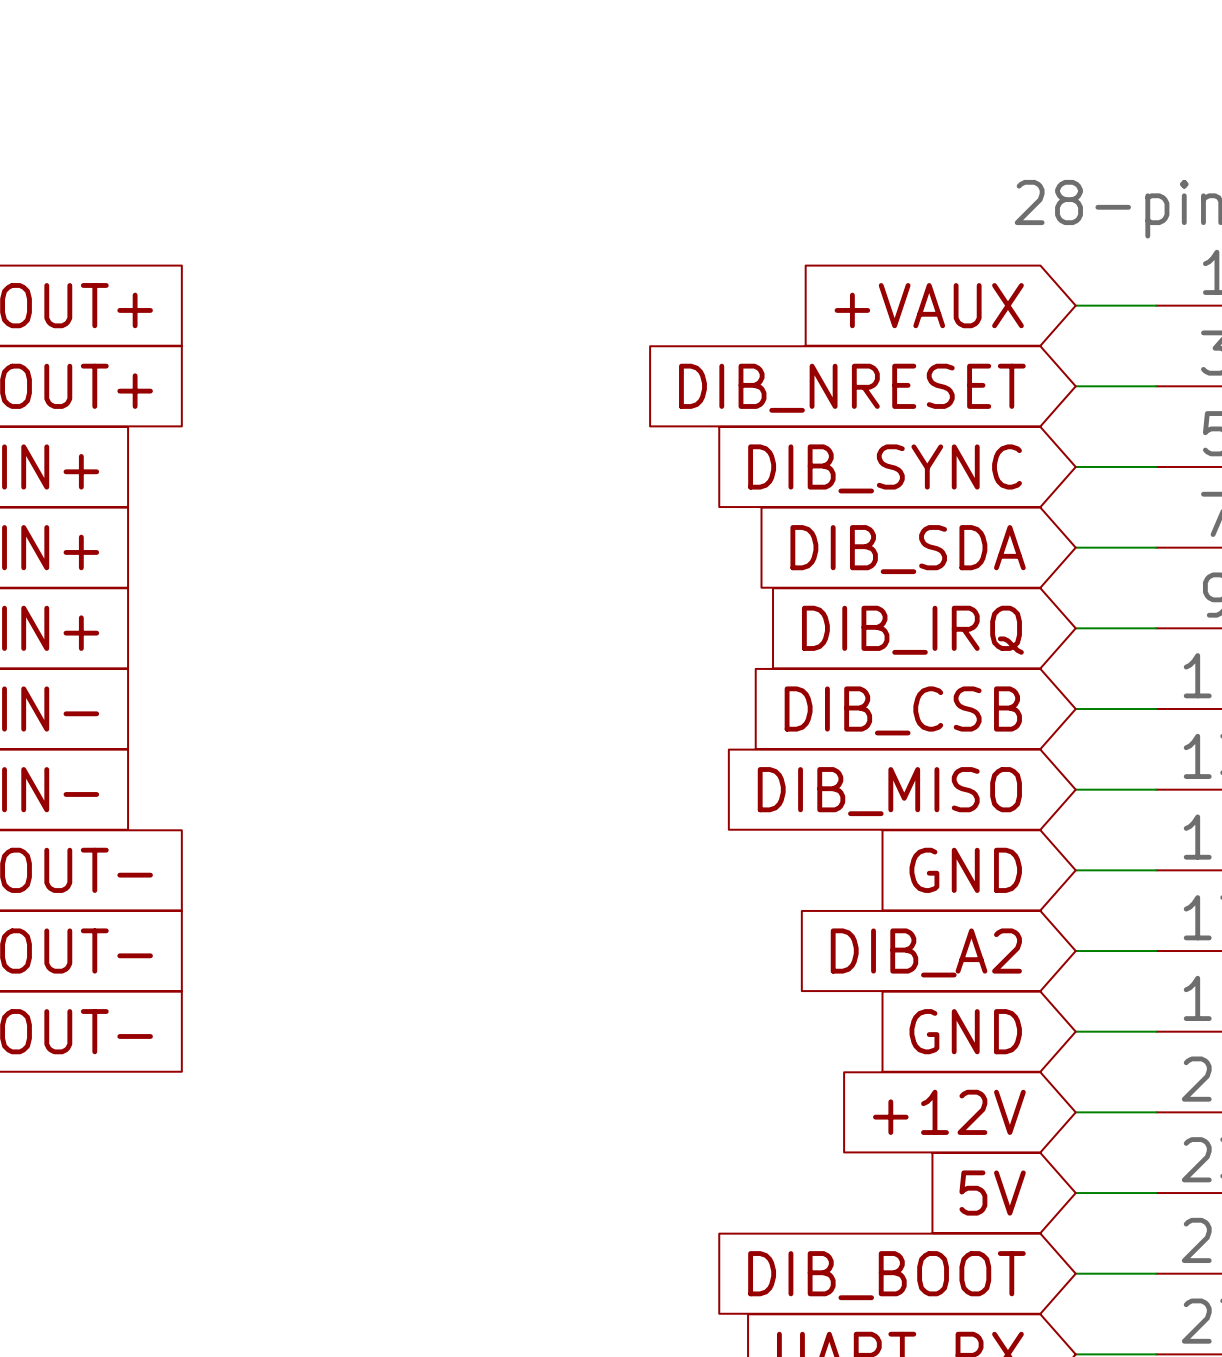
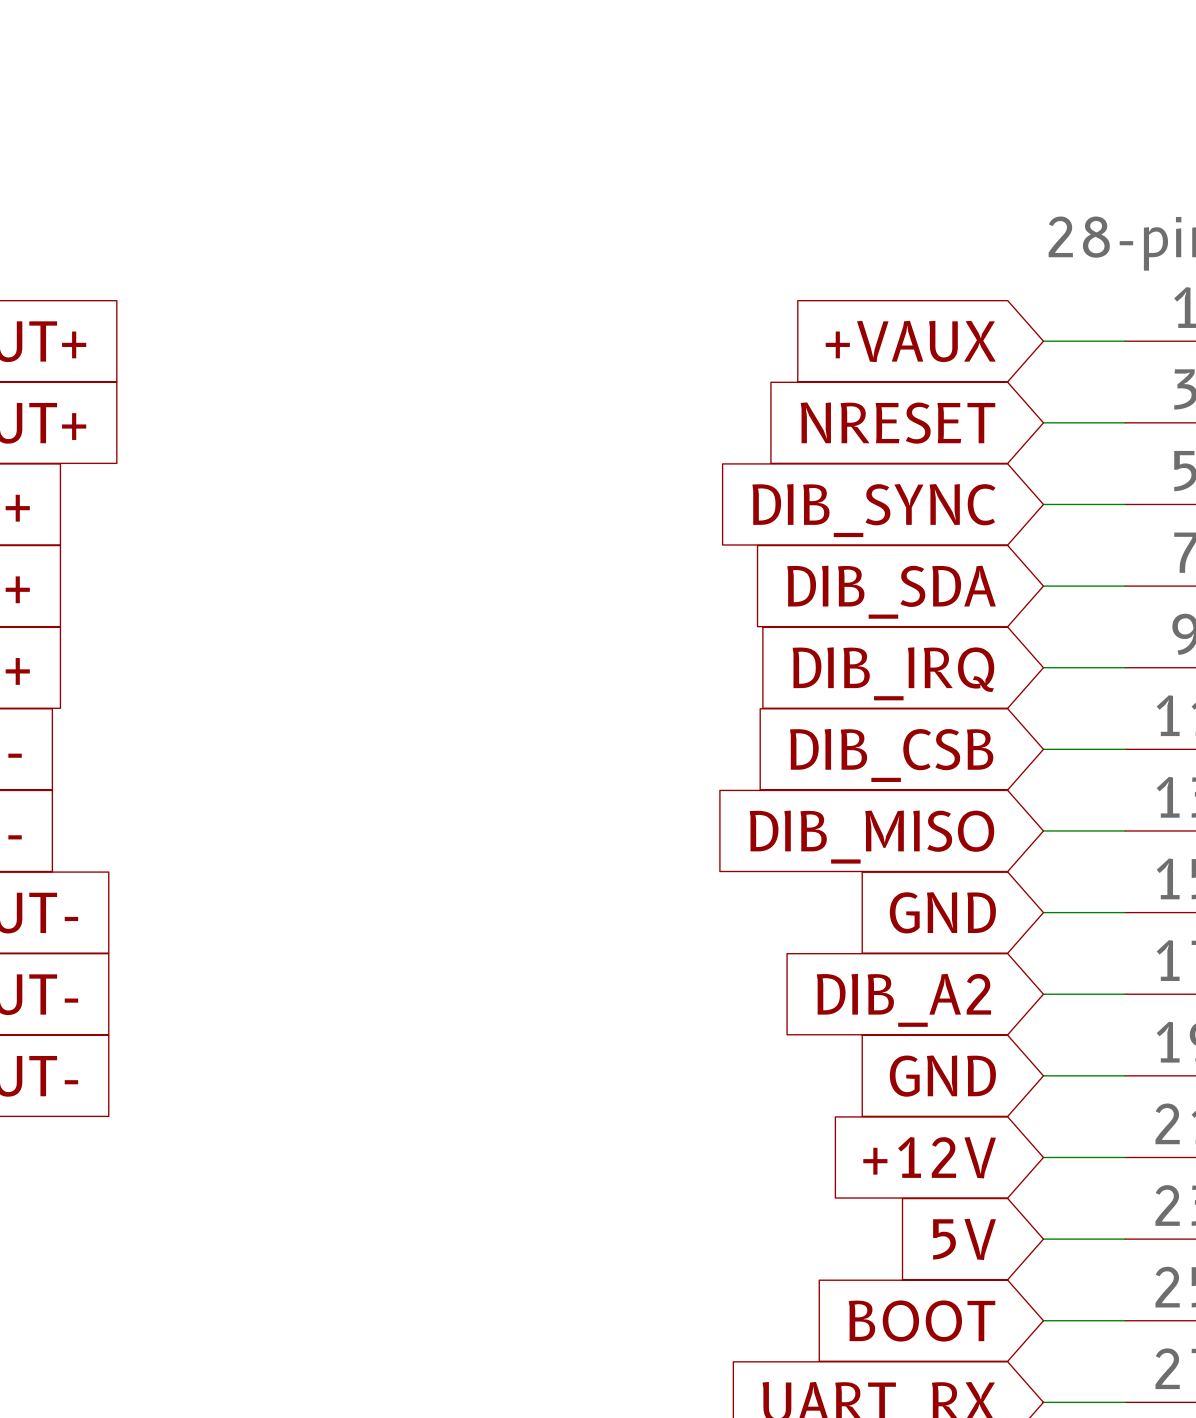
global label: DIB_NRESET (852, 388) -> NRESET (898, 423)
global label: DIB_BOOT (886, 1275) -> BOOT (922, 1321)

